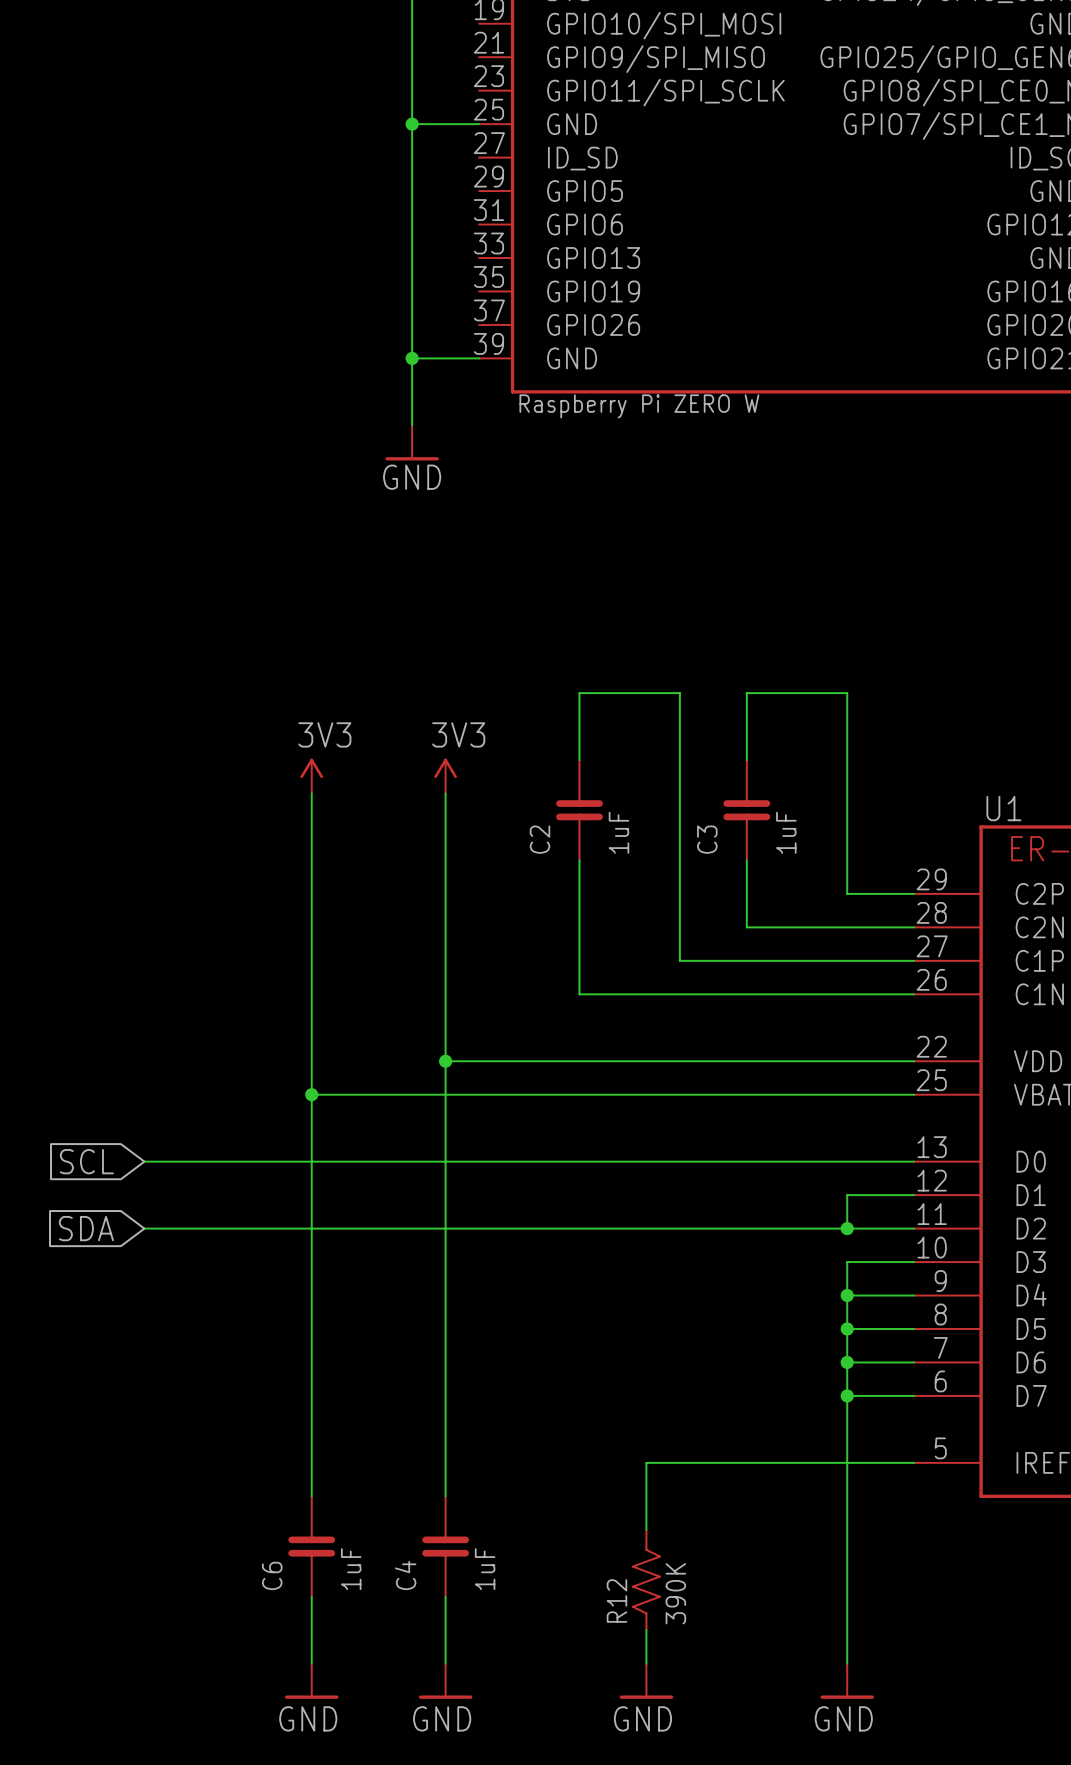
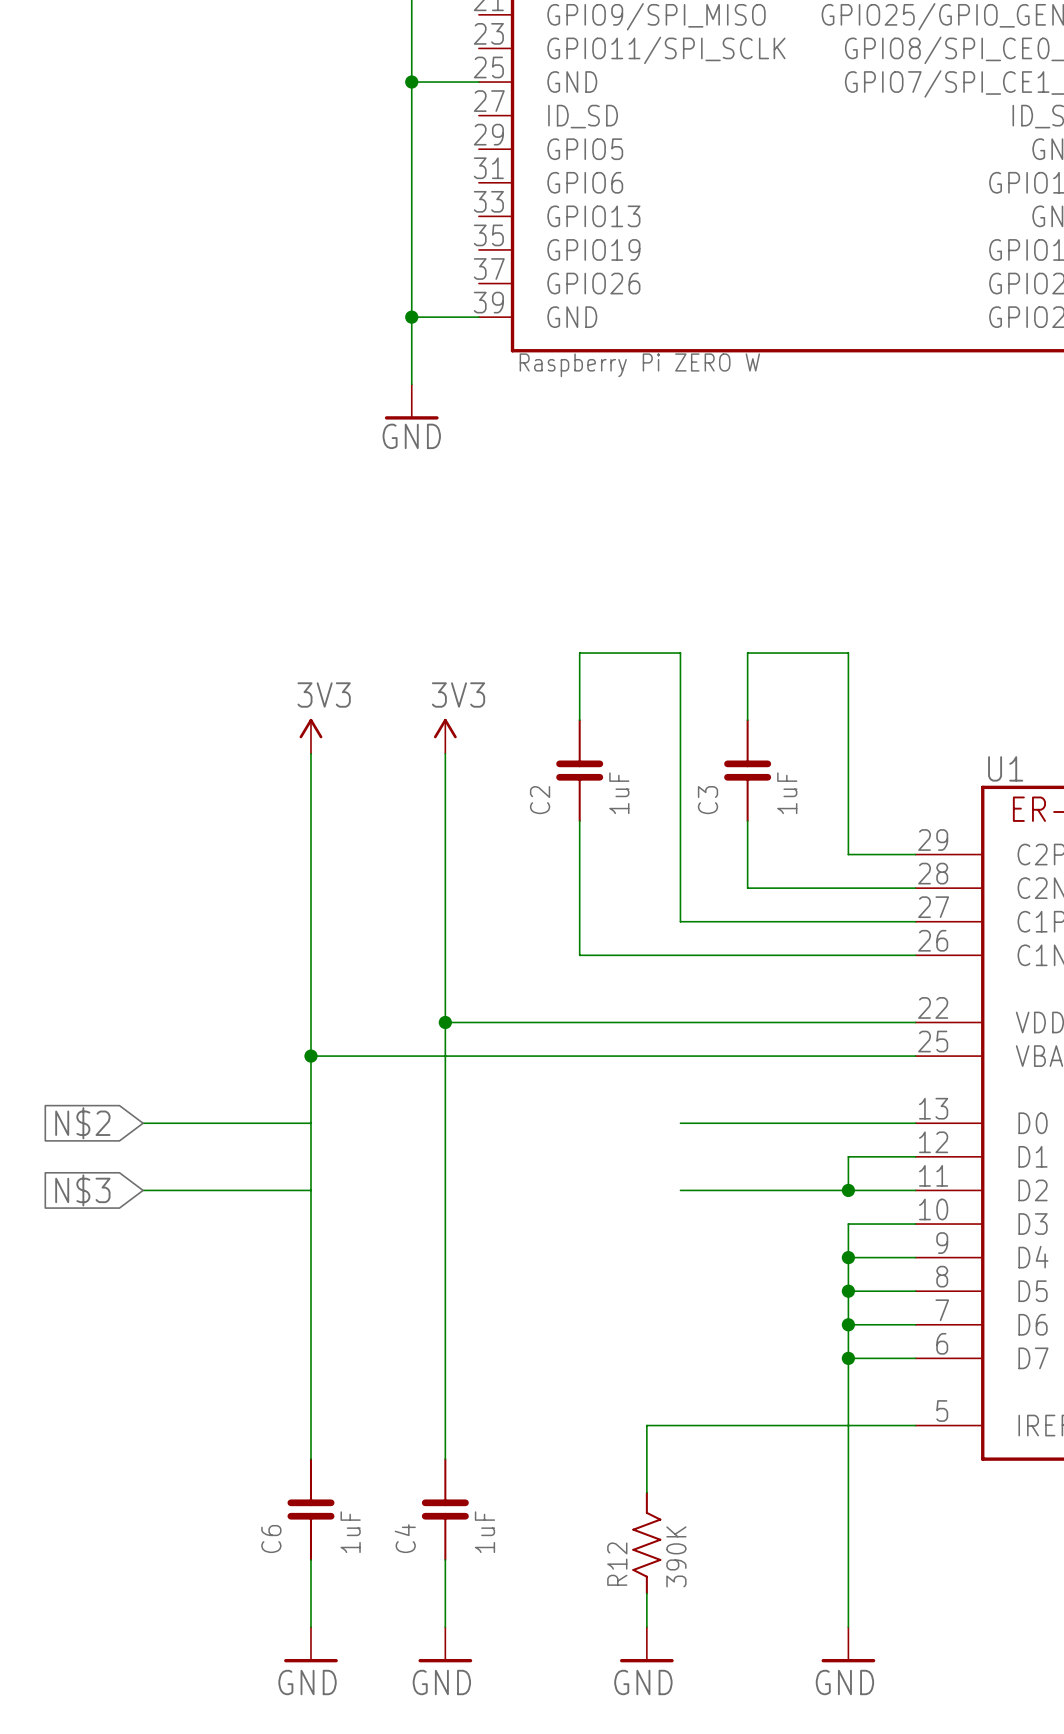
global label: SCL (86, 1161) -> N$2 (82, 1123)
wire: (311, 1161) (679, 1161) -> none
global label: SDA (86, 1228) -> N$3 (82, 1190)
wire: (311, 1228) (679, 1228) -> none

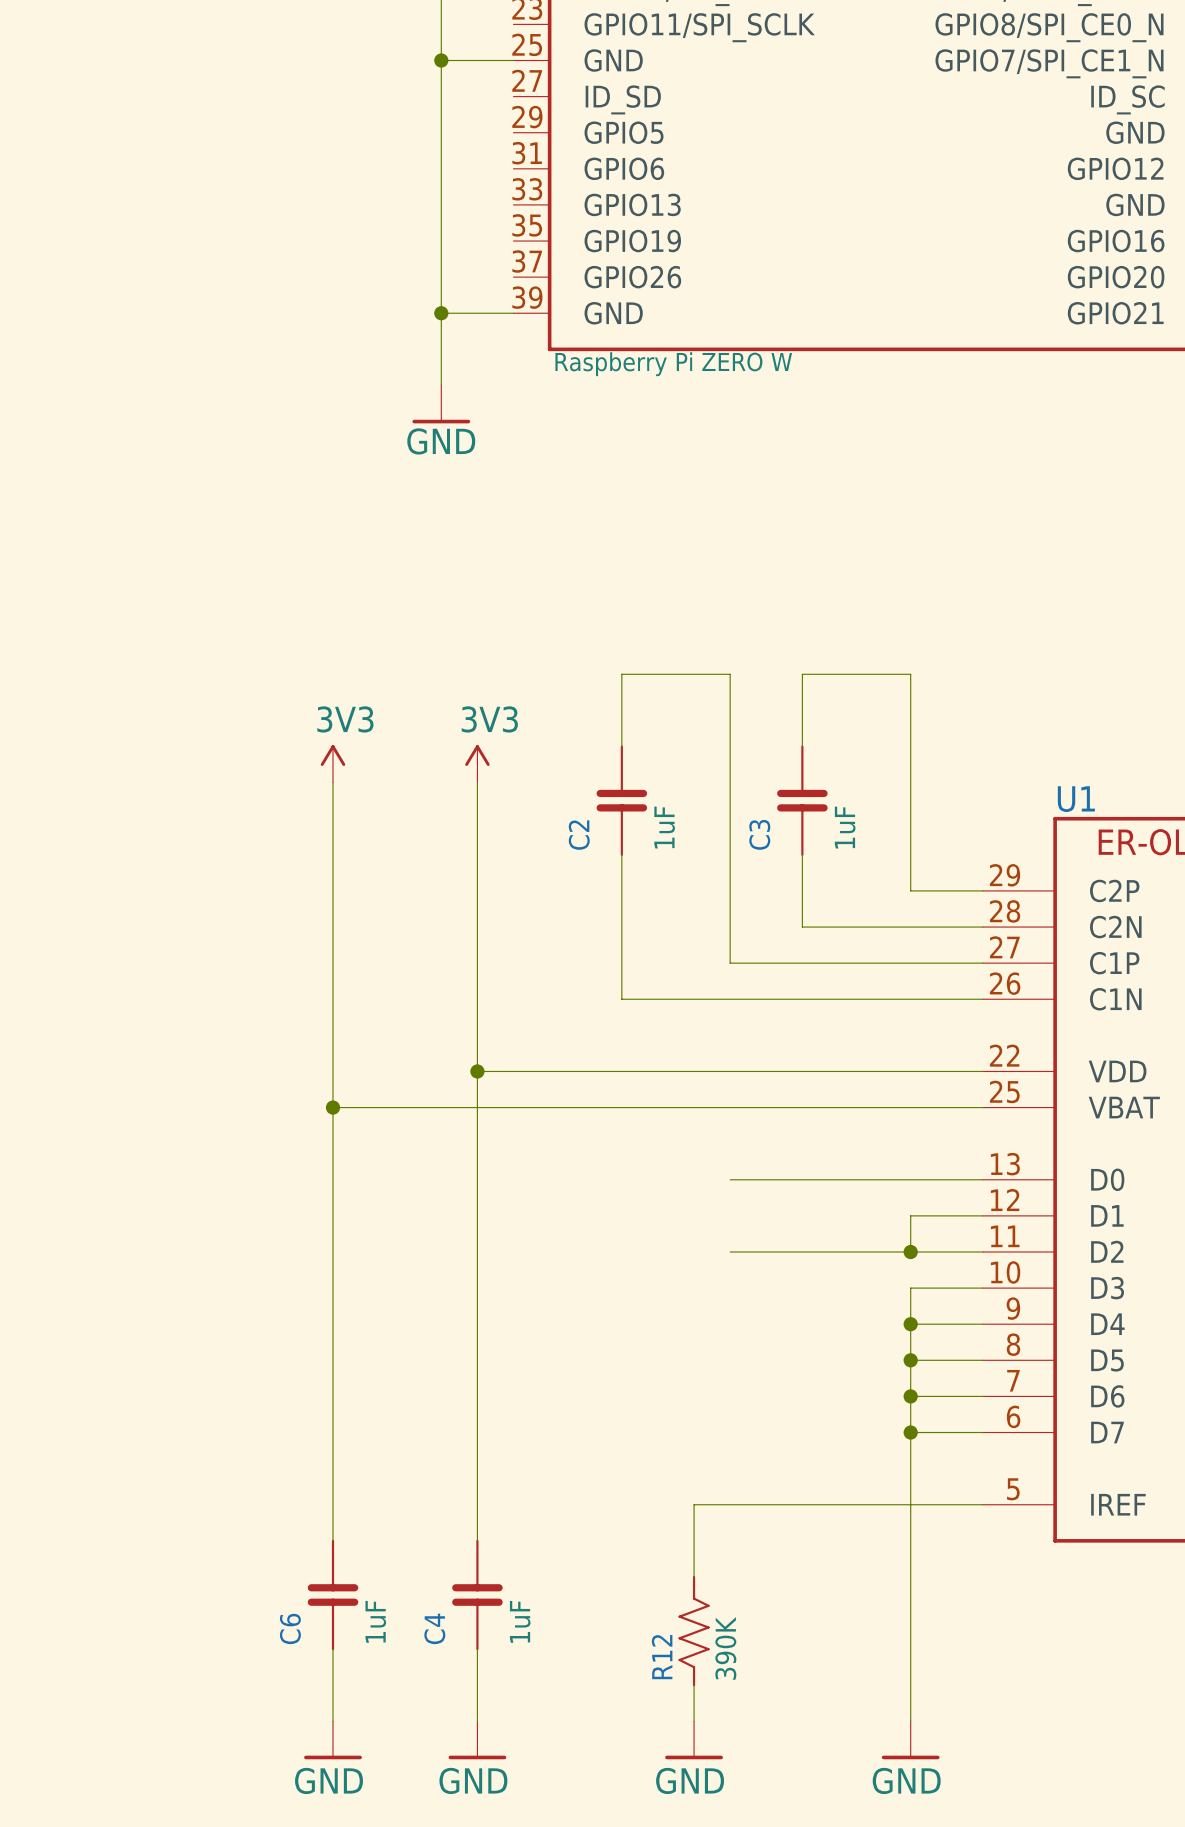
global label: N$2 (82, 1123) -> none
wire: (143, 1123) (310, 1123) -> none
global label: N$3 (82, 1190) -> none
wire: (143, 1190) (310, 1190) -> none

